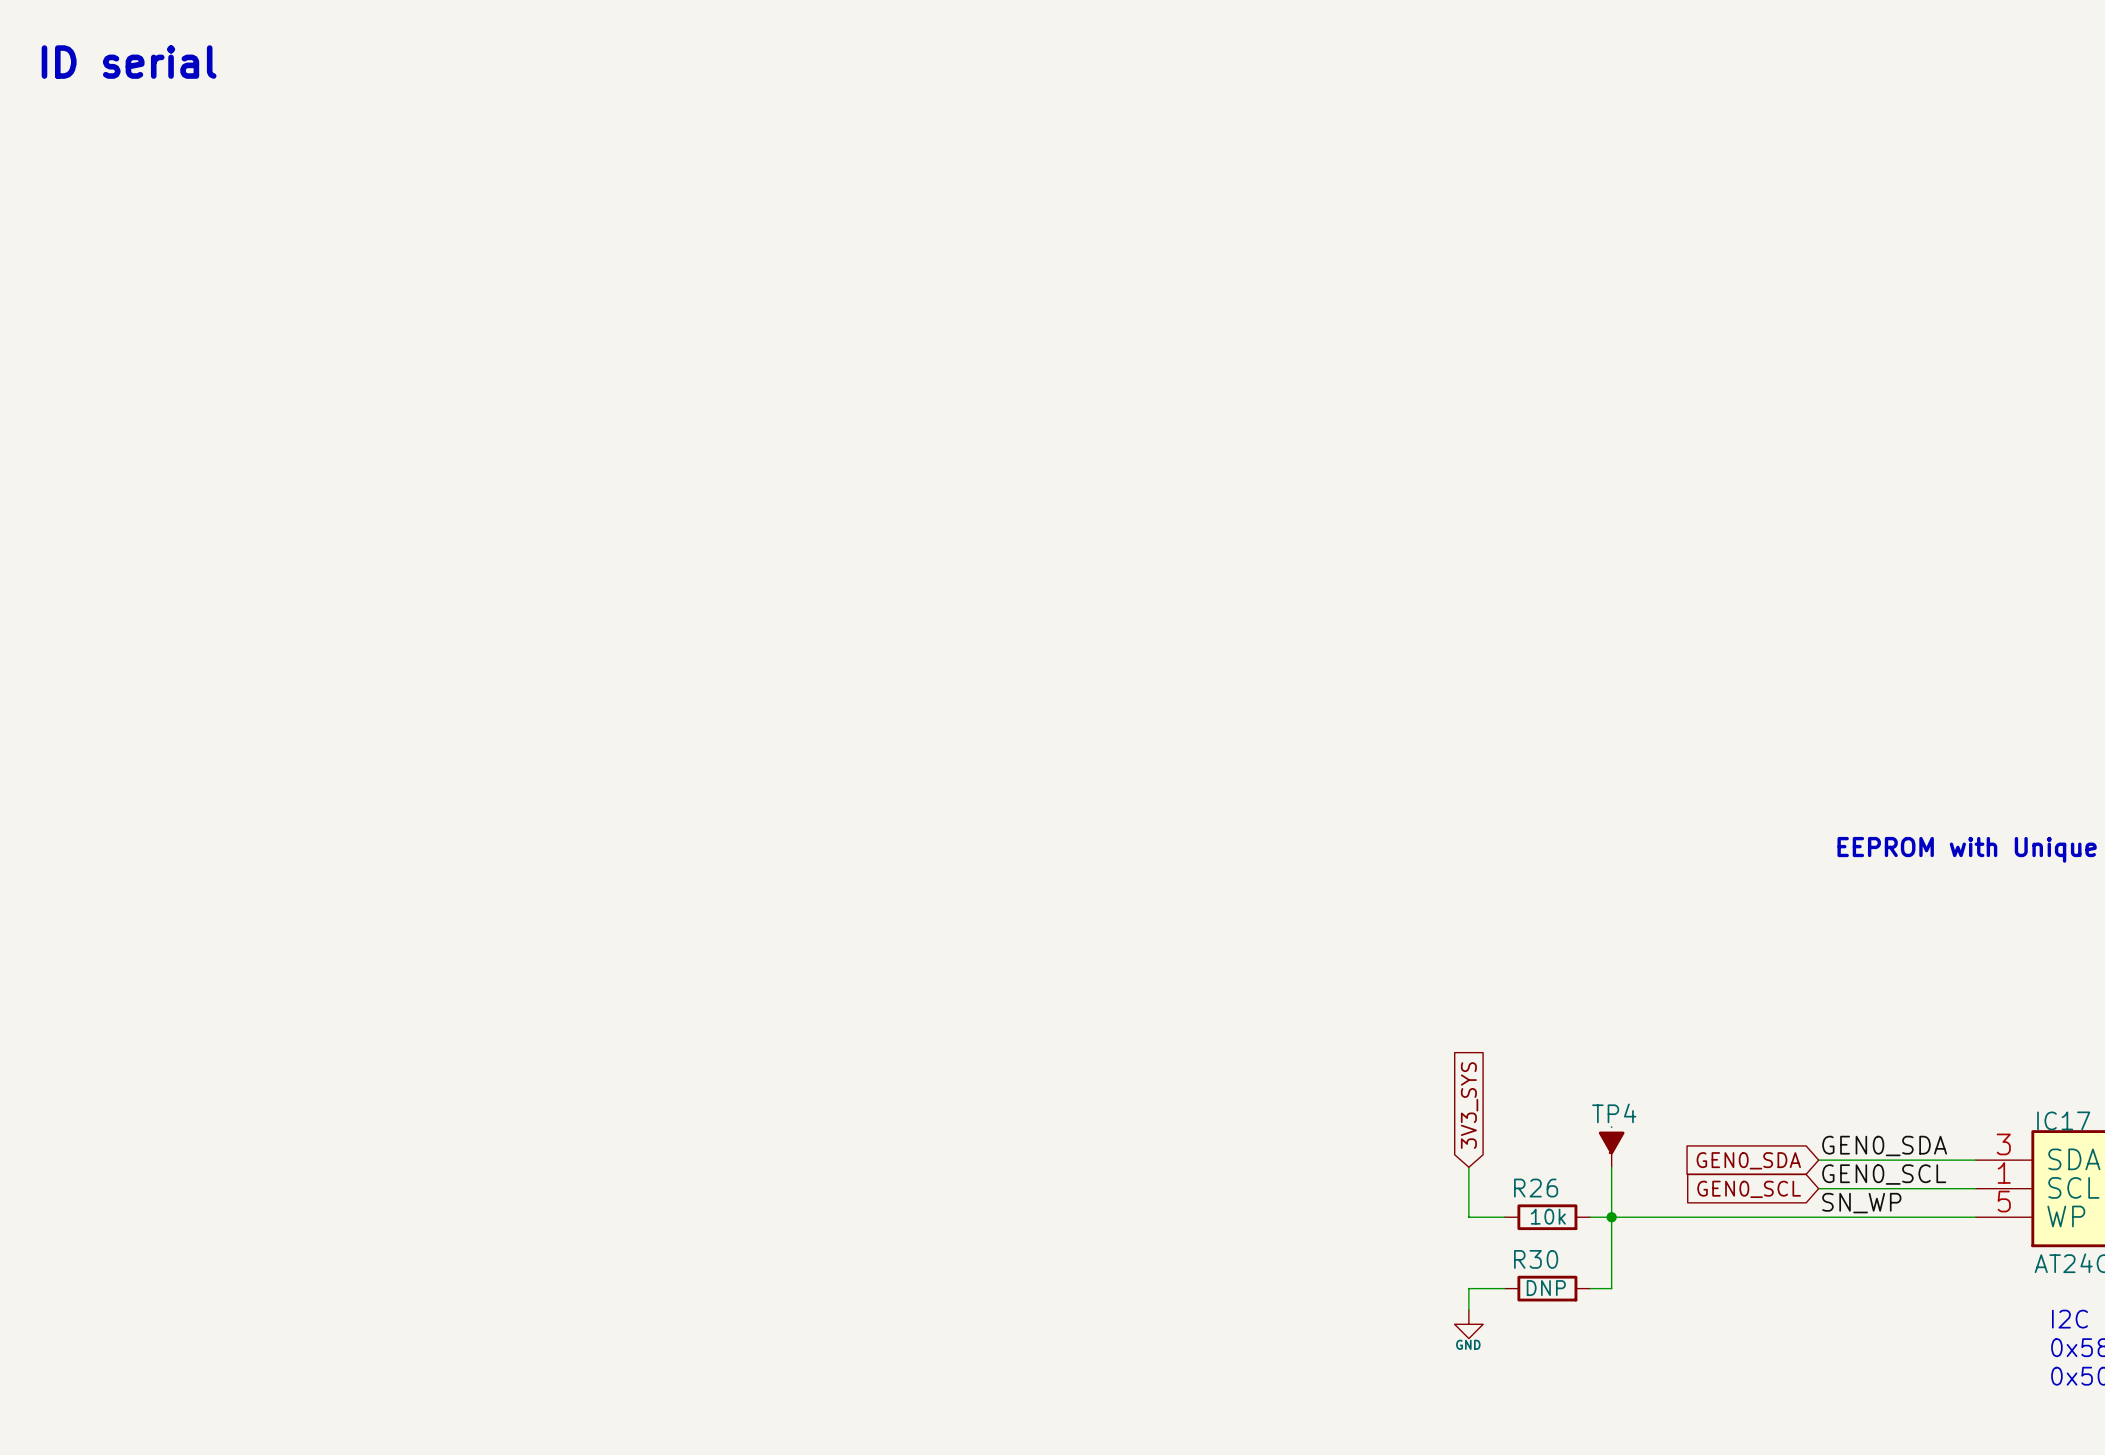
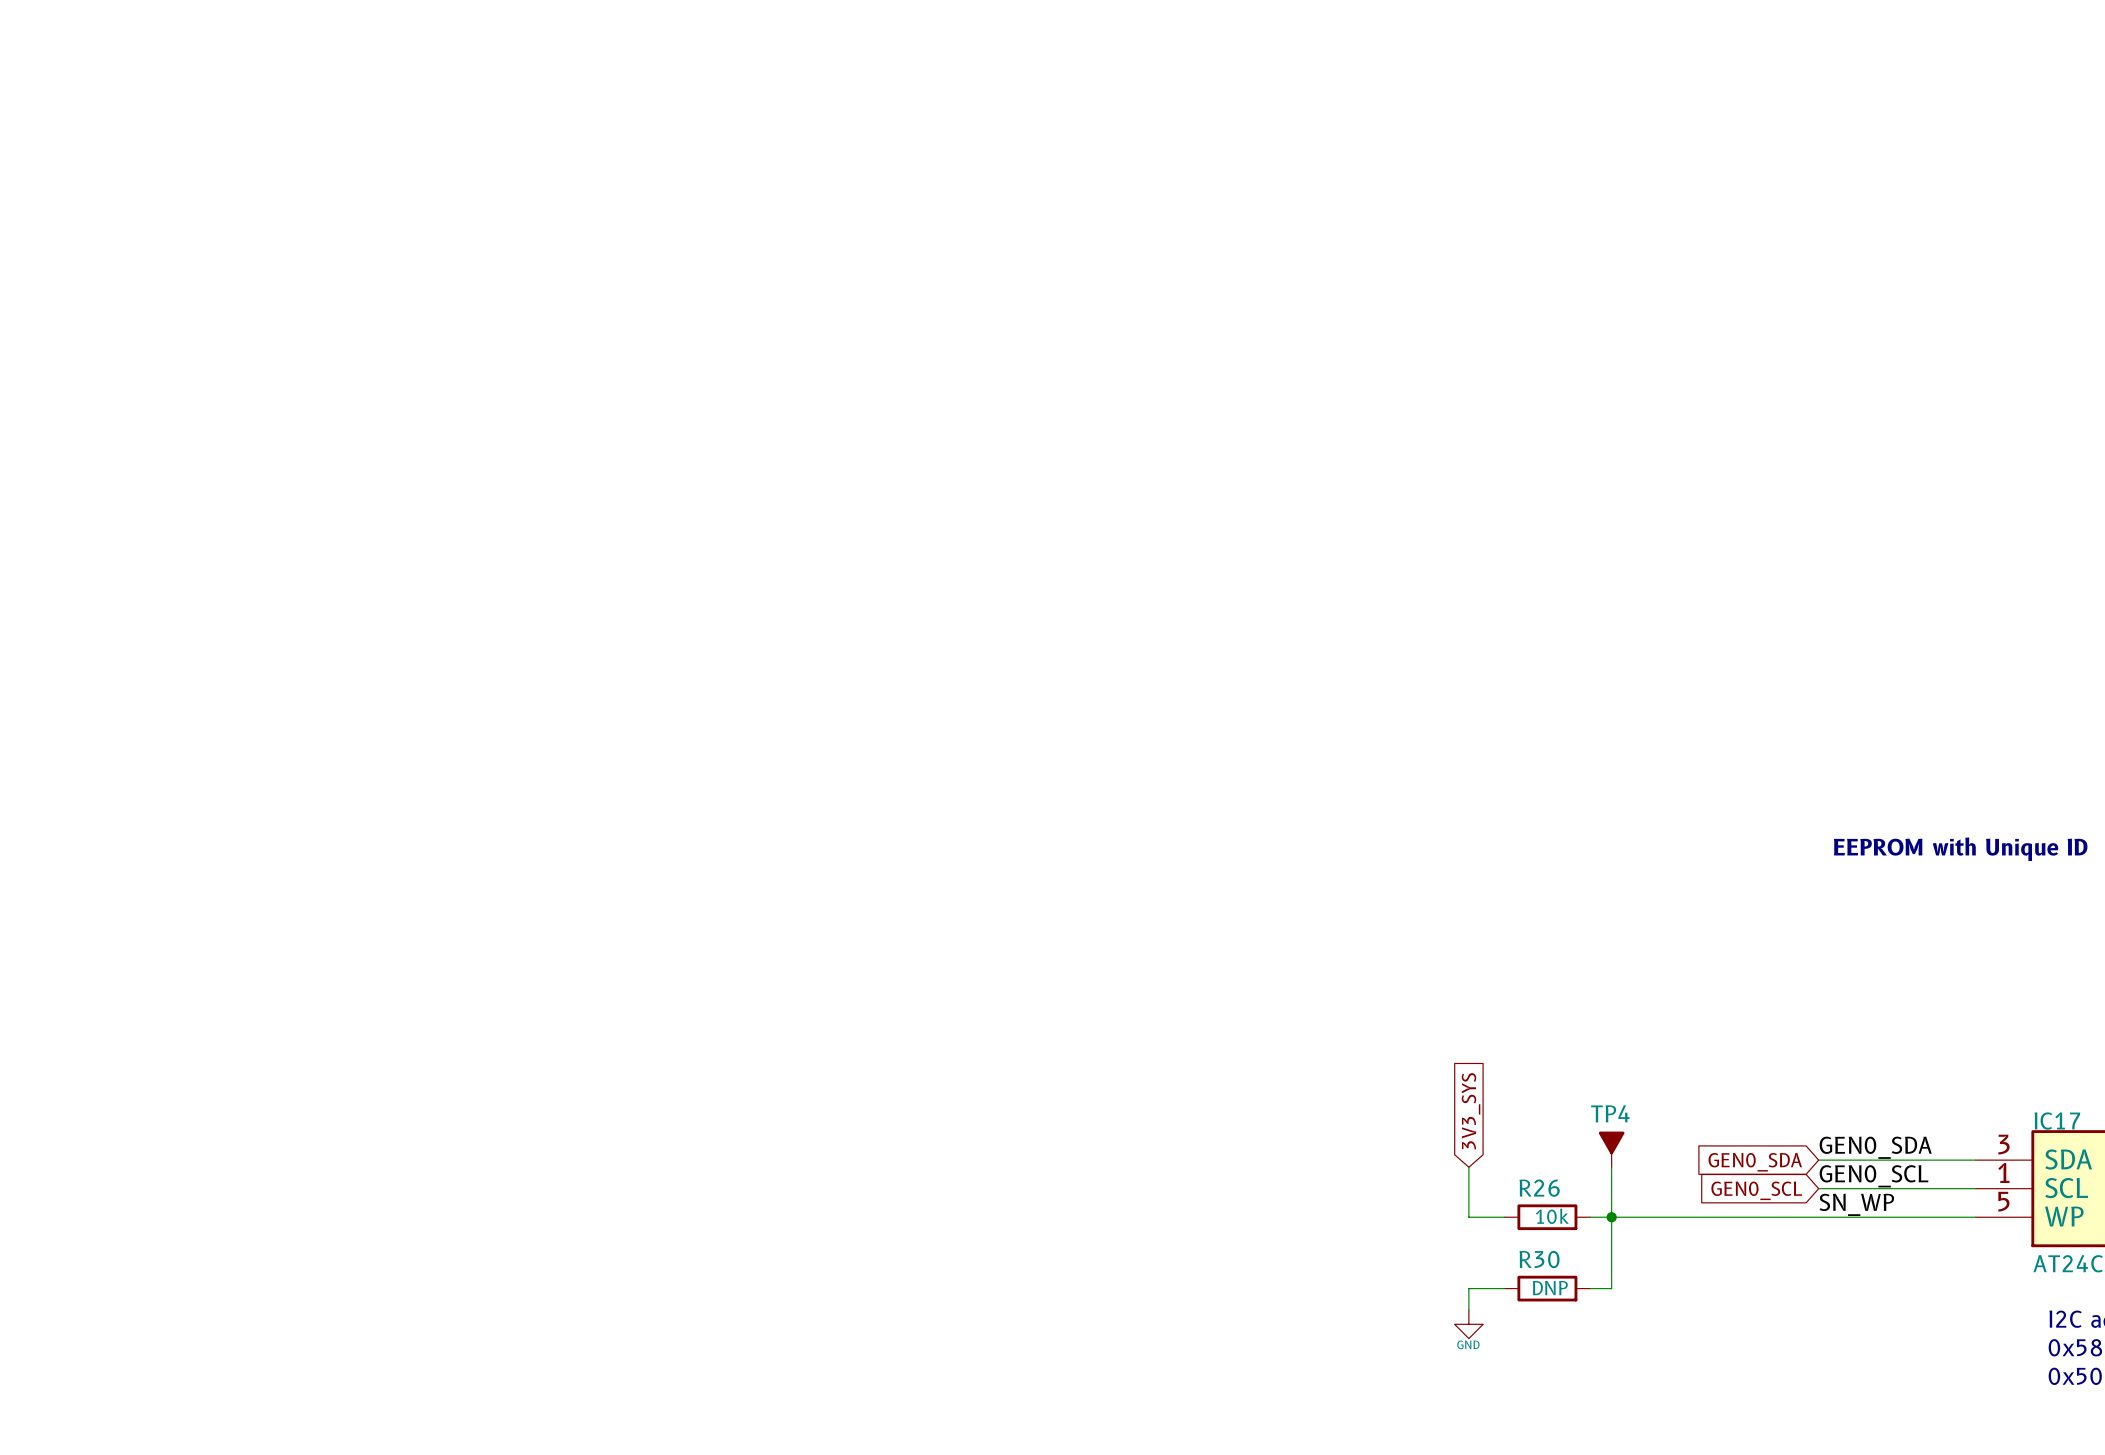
text: ID serial (129, 62) -> none

